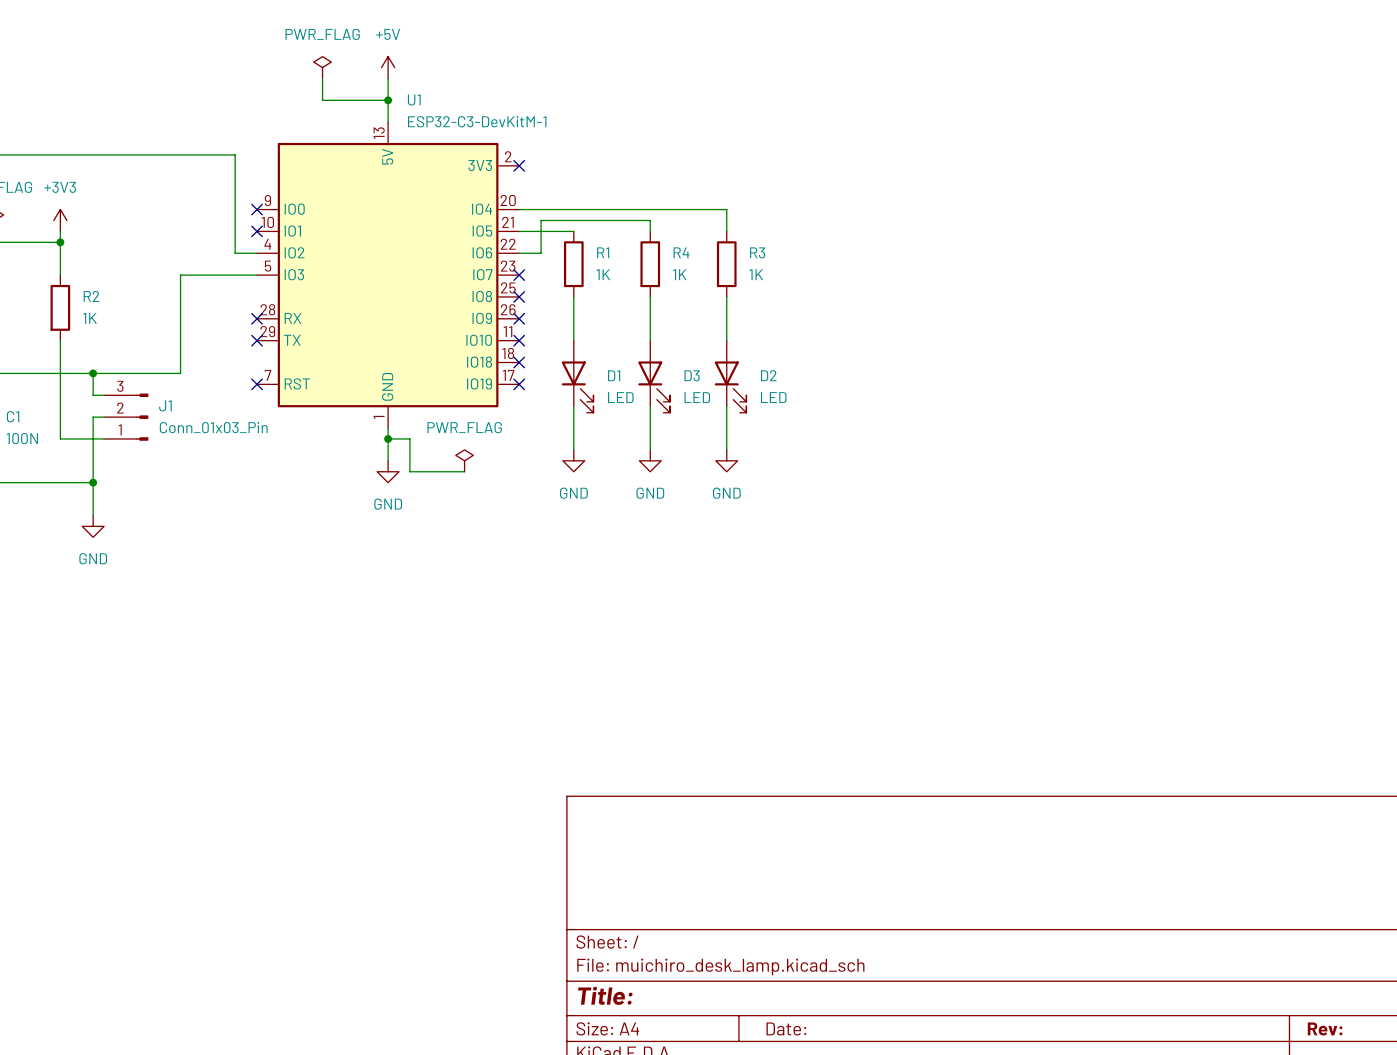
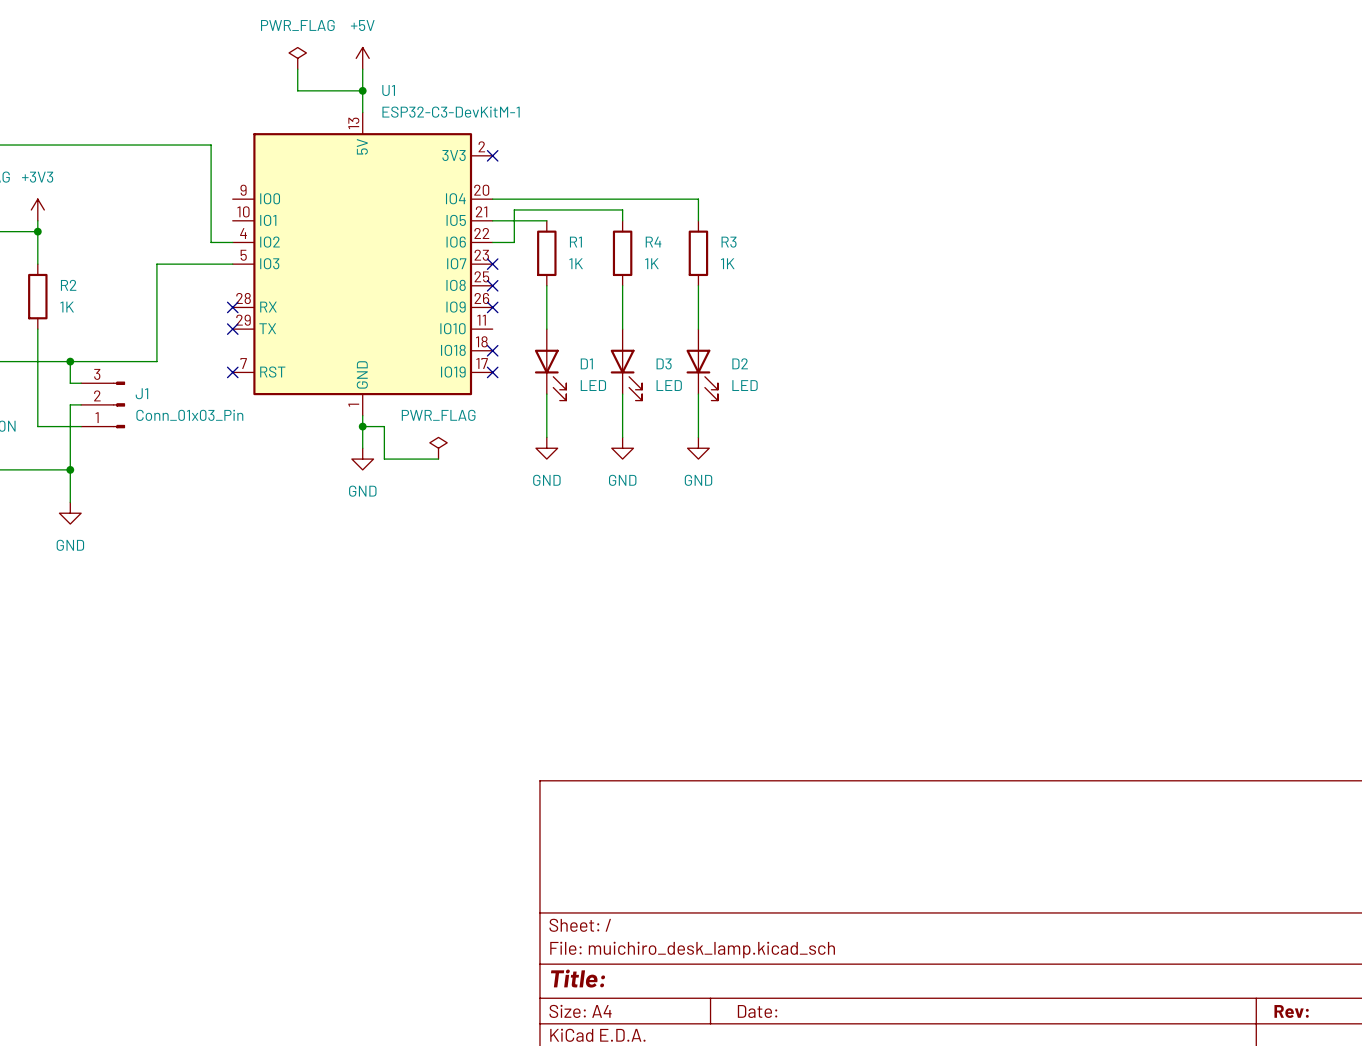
no-connect mark: (257, 209) -> none
no-connect mark: (257, 231) -> none
no-connect mark: (519, 340) -> none

